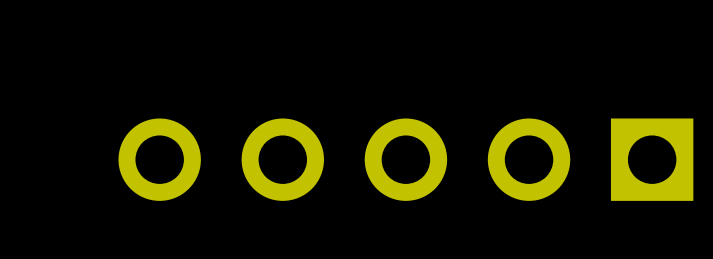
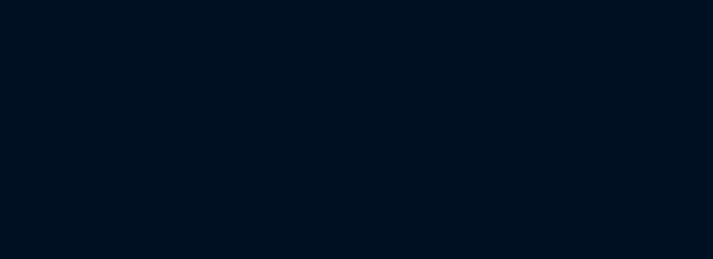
part: (405, 159) -> none

